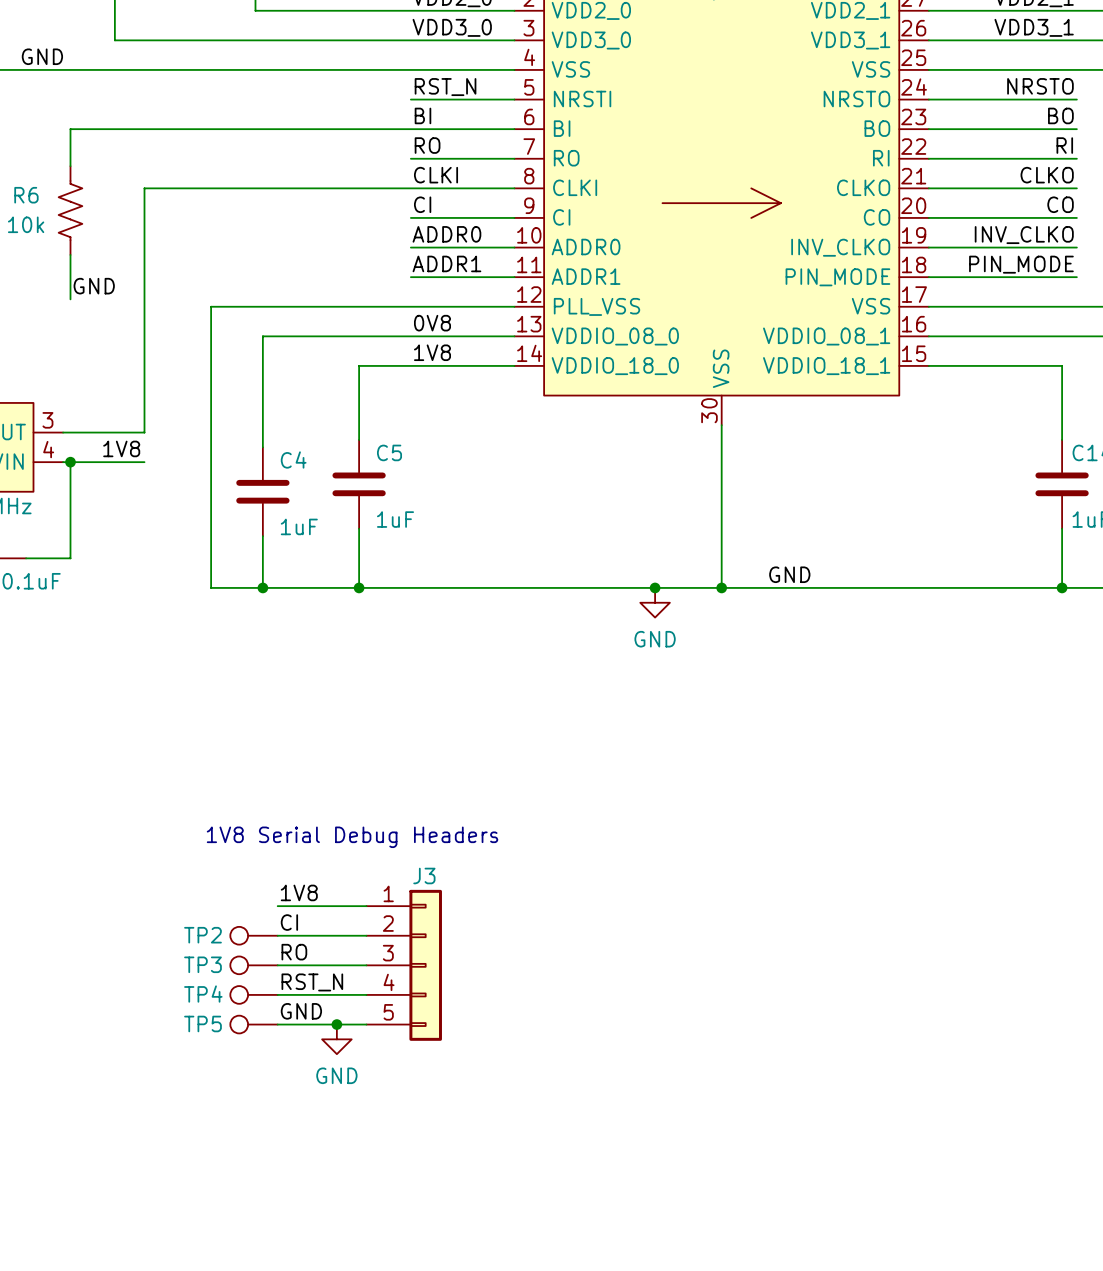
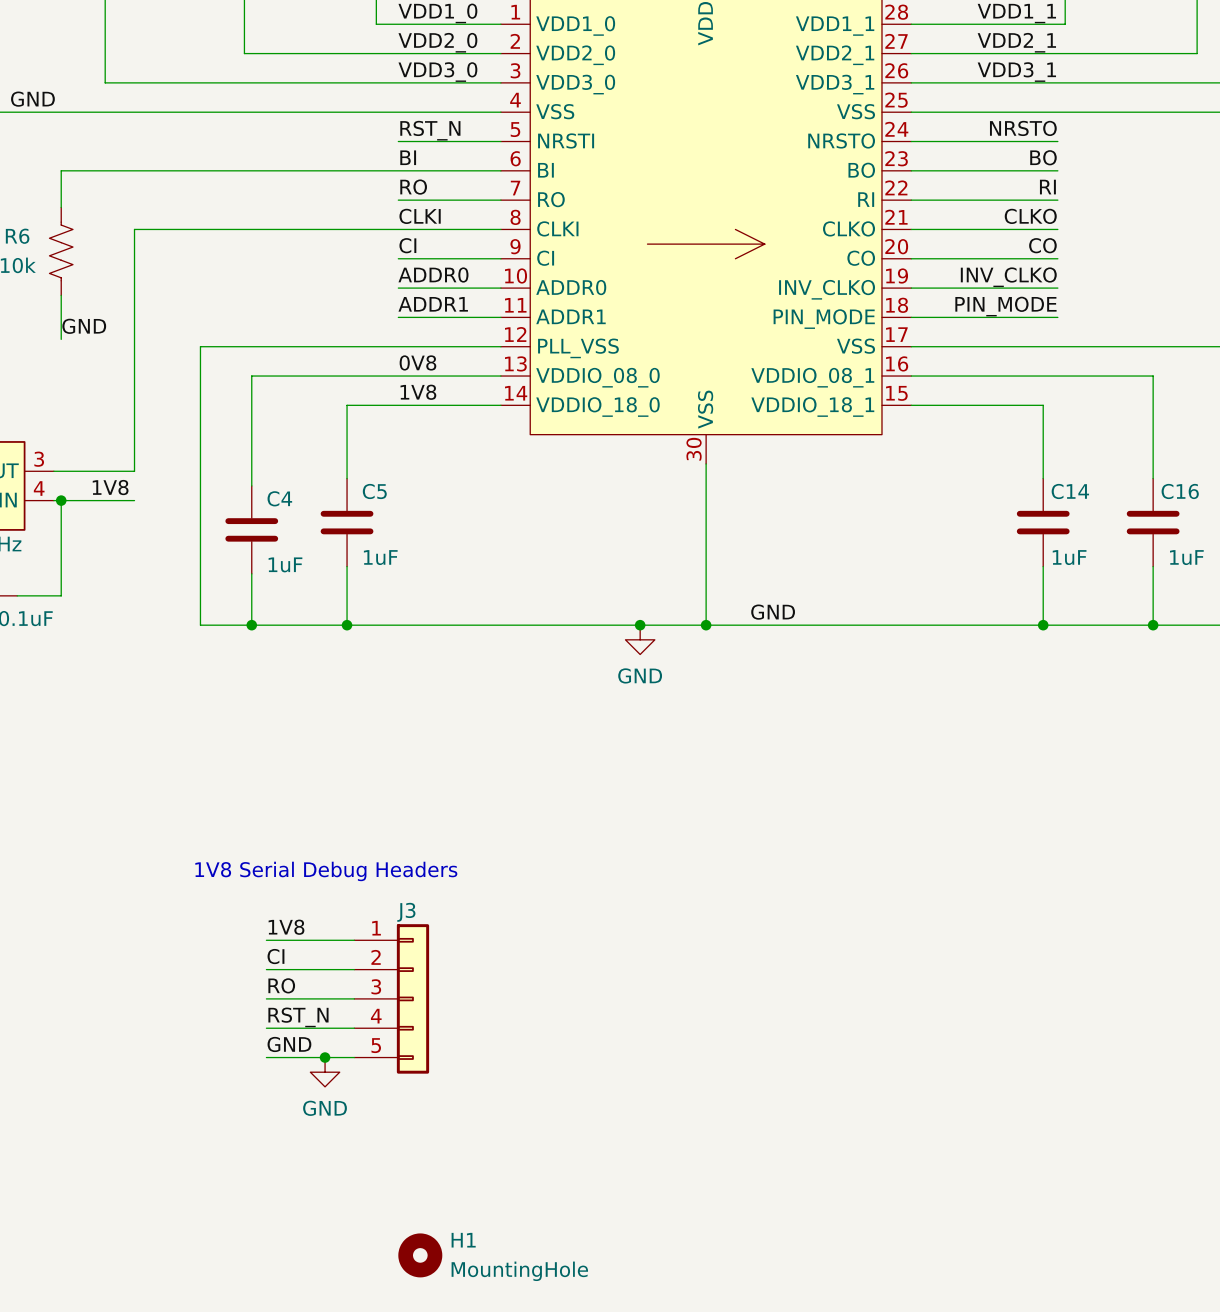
TP2: (254, 935) -> none
TP3: (254, 965) -> none
TP4: (254, 994) -> none
TP5: (254, 1024) -> none
H1: none -> MountingHole (420, 1255)

